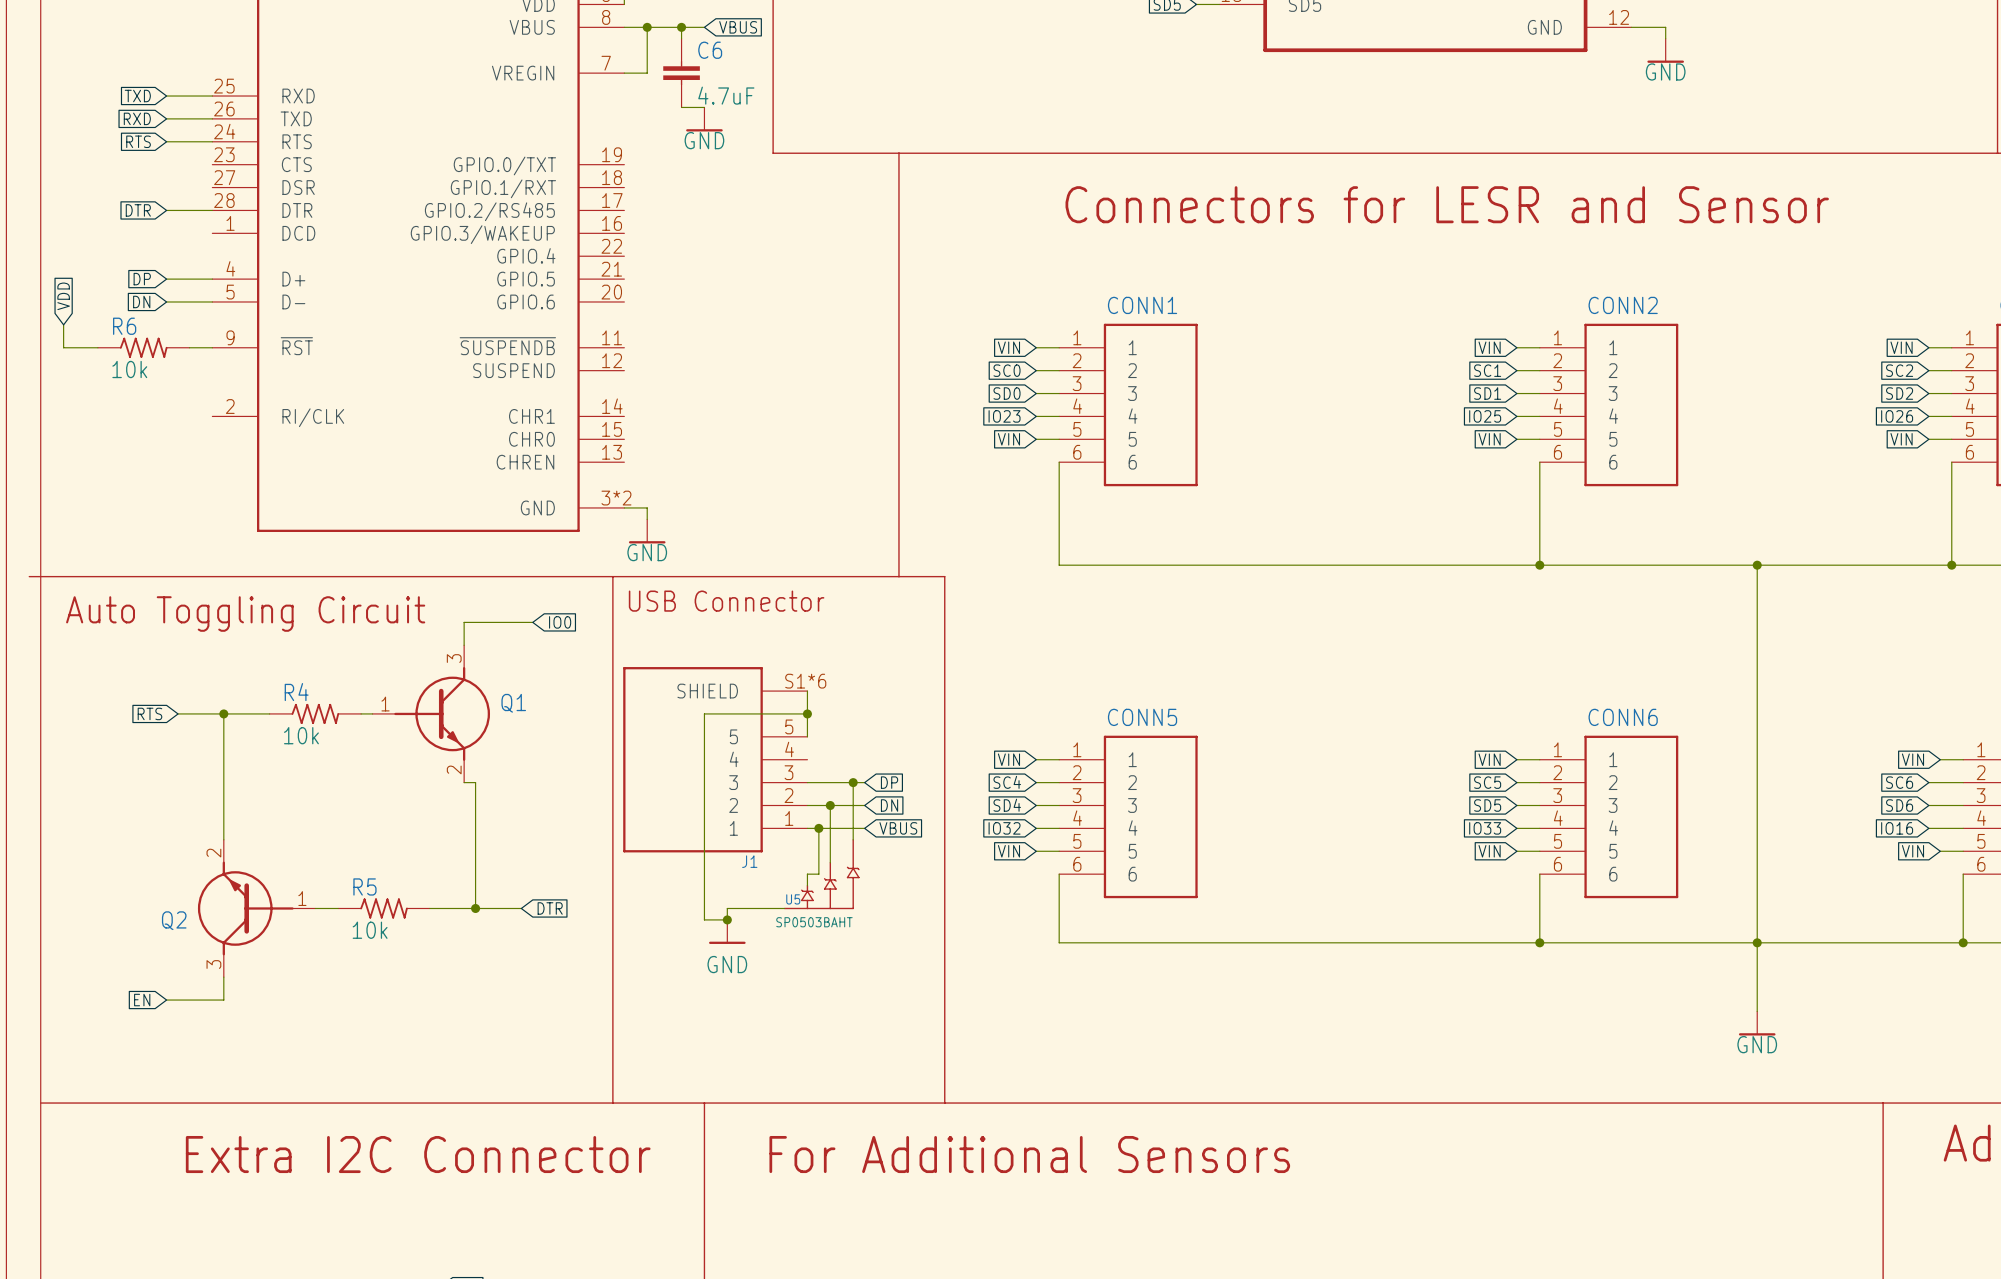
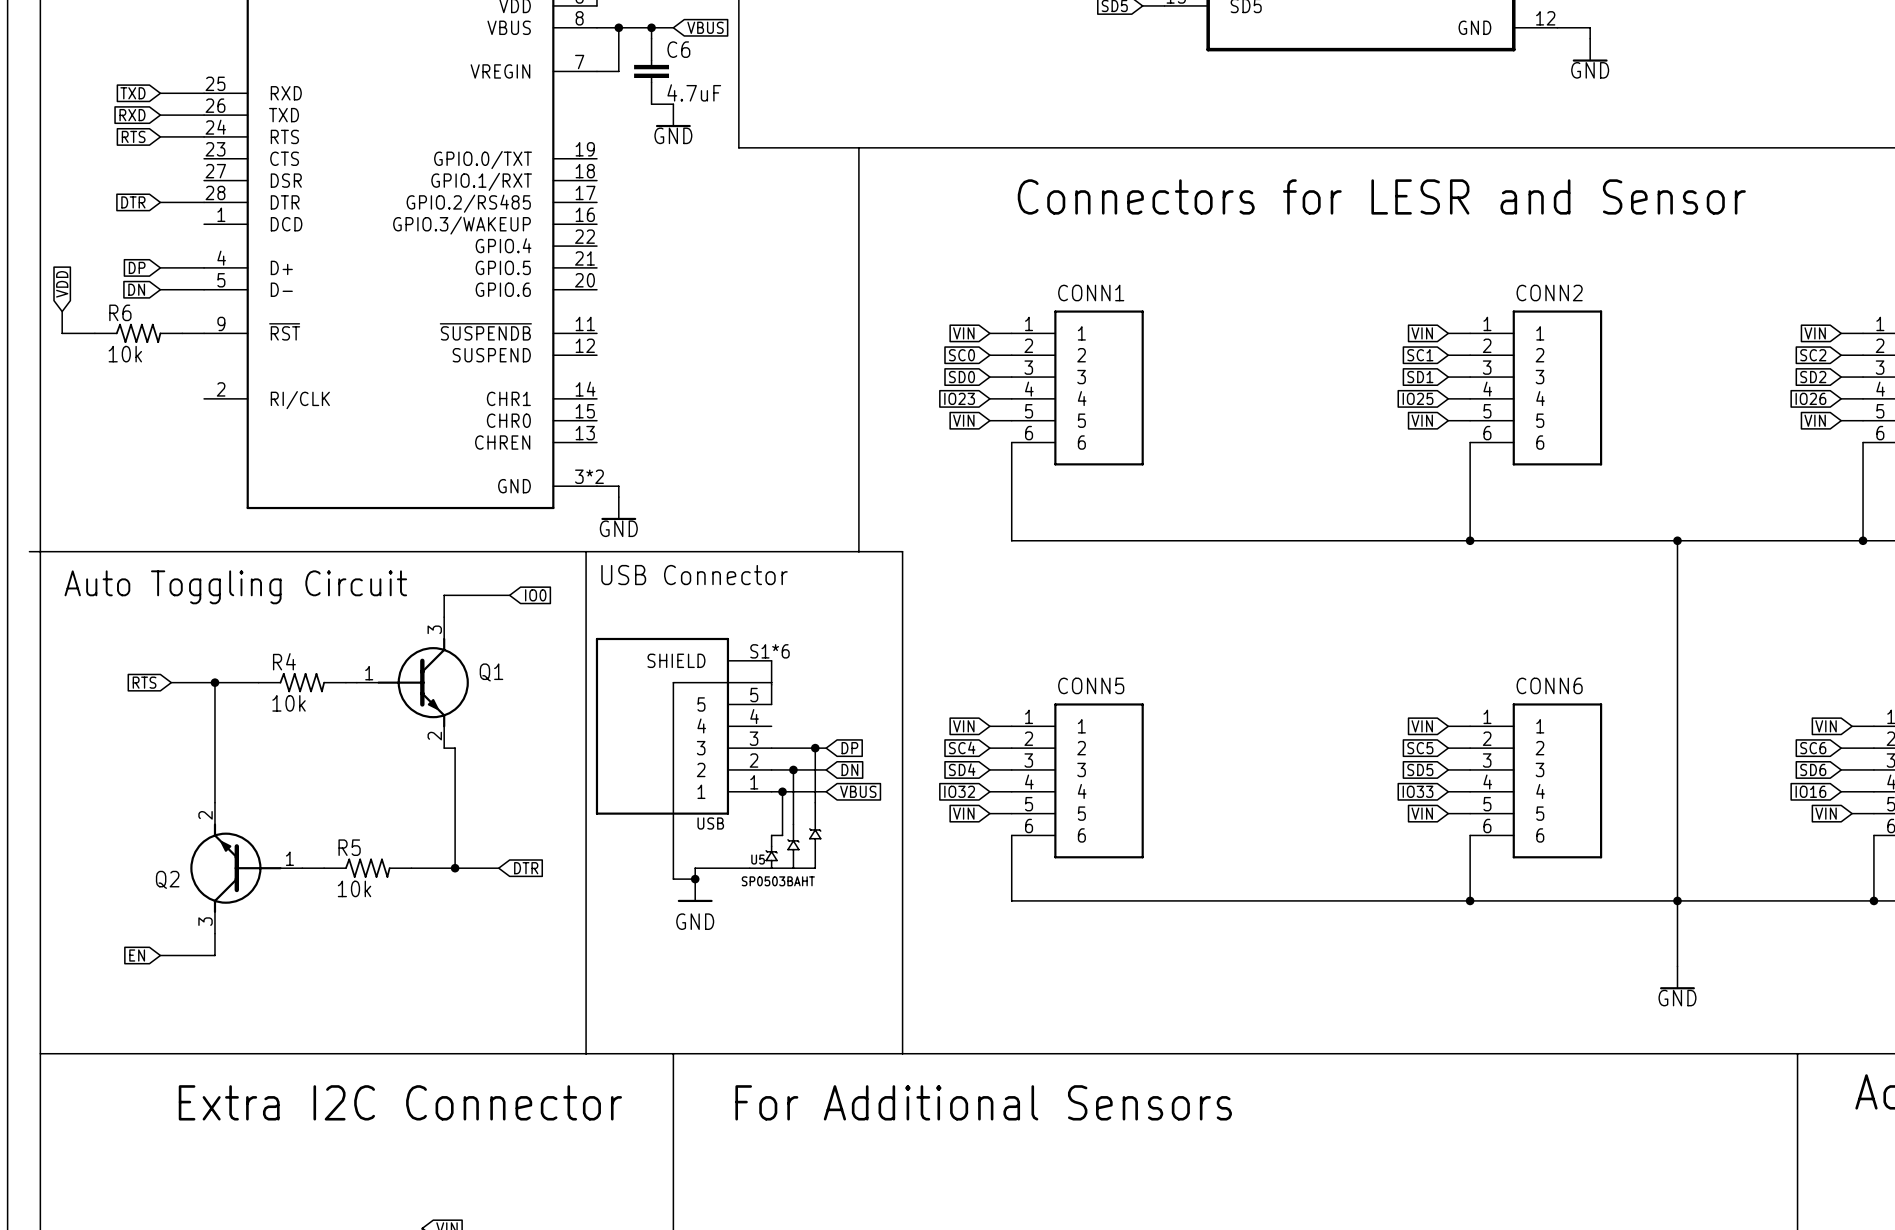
junction: (807, 713) -> none
J1 name: J1 (749, 861) -> USB (710, 823)

